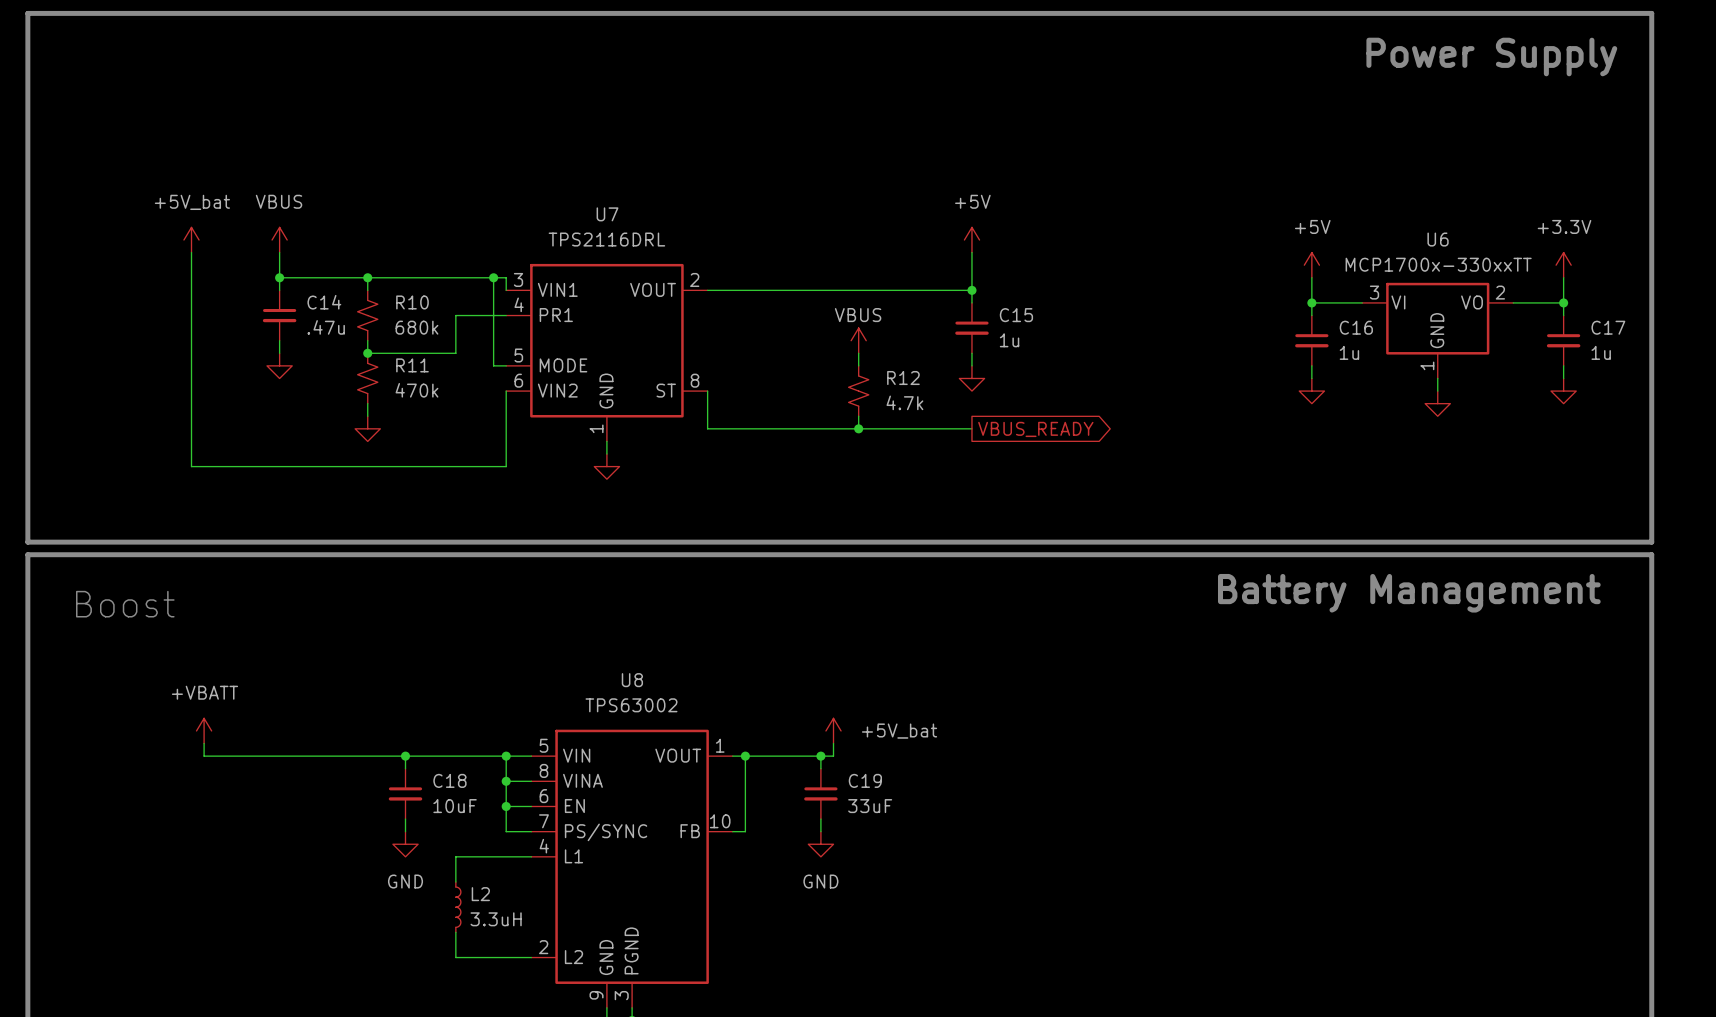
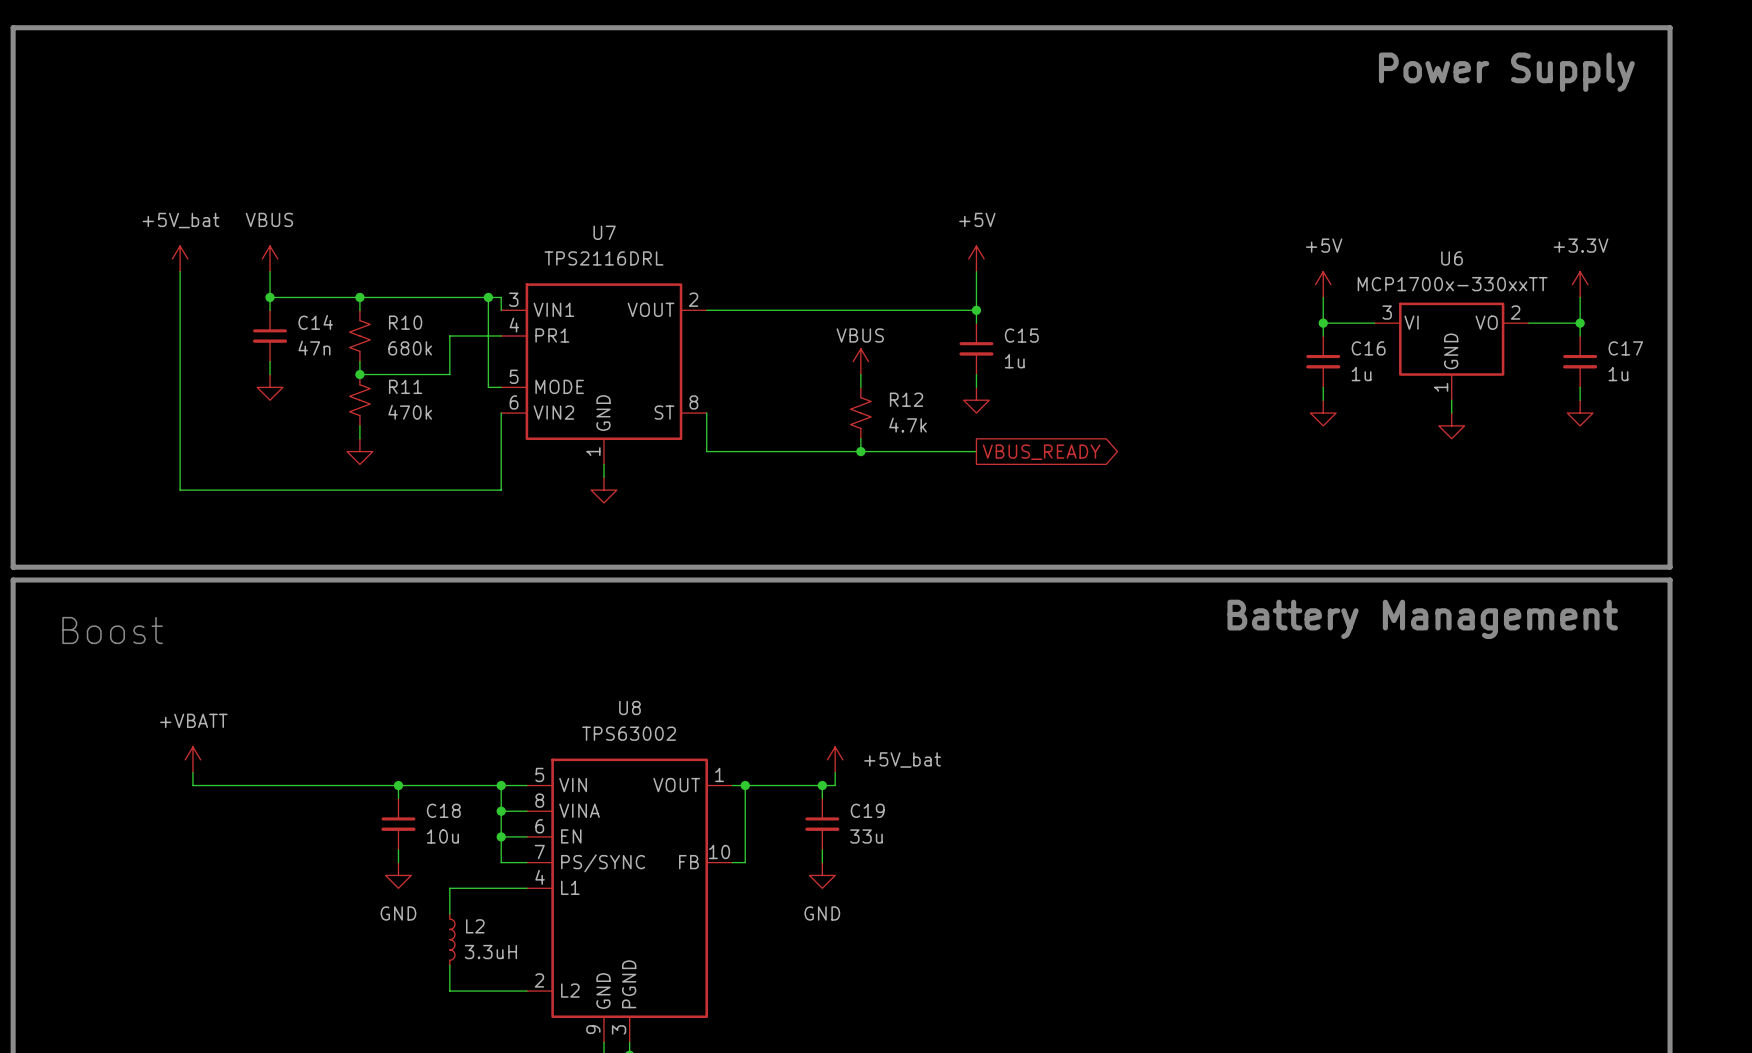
C14 value: .47u (326, 327) -> 47n (314, 348)
C18 value: 10uF (455, 806) -> 10u (442, 836)
C19 value: 33uF (870, 806) -> 33u (866, 836)

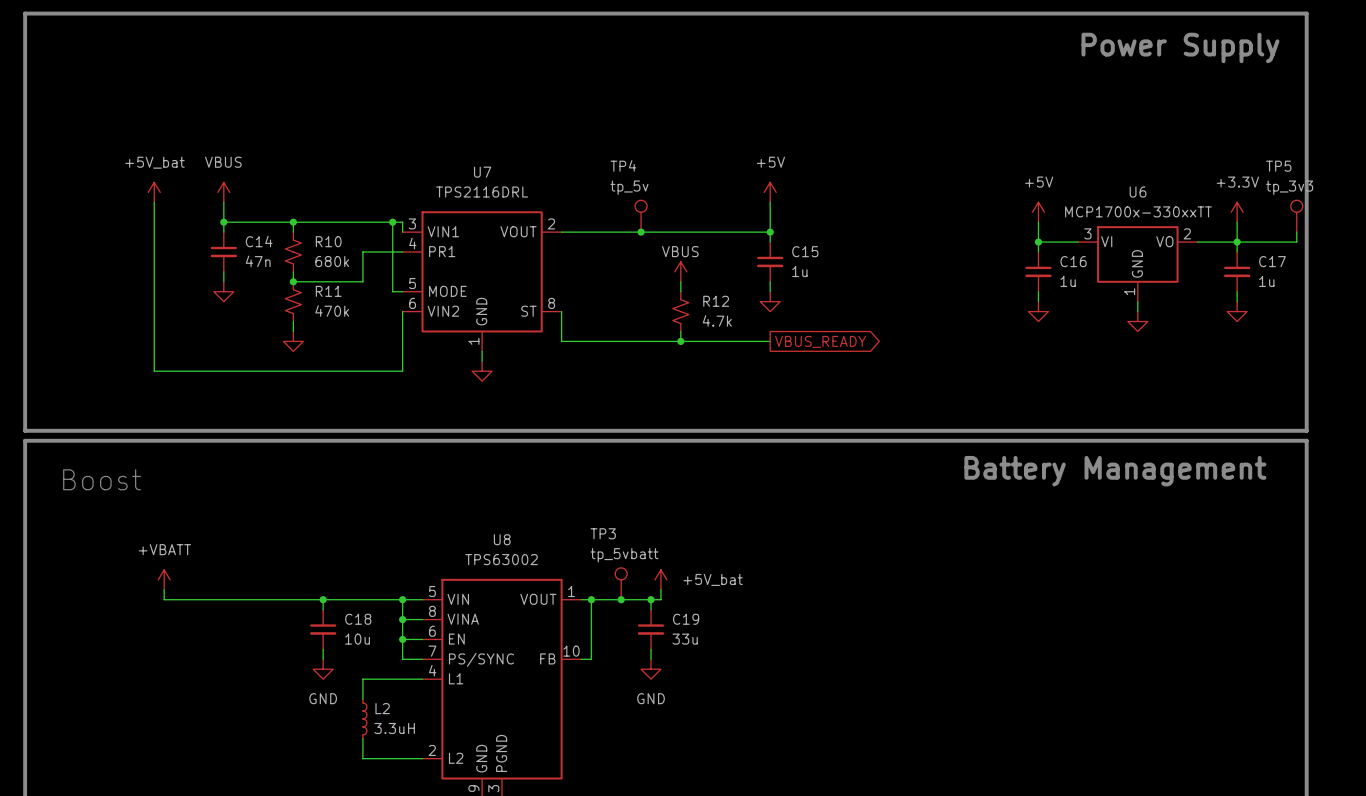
TP4: none -> tp_5v (641, 216)
TP5: none -> tp_3v3 (1296, 216)
junction: none -> (641, 232)
wire: none -> (1296, 232) (1296, 242) (1237, 242)
TP3: none -> tp_5vbatt (621, 583)
junction: none -> (621, 599)

